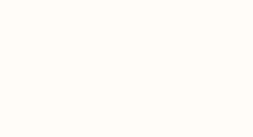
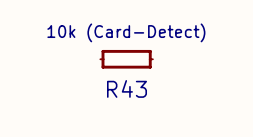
R43: none -> 10k (Card-Detect) (126, 59)

